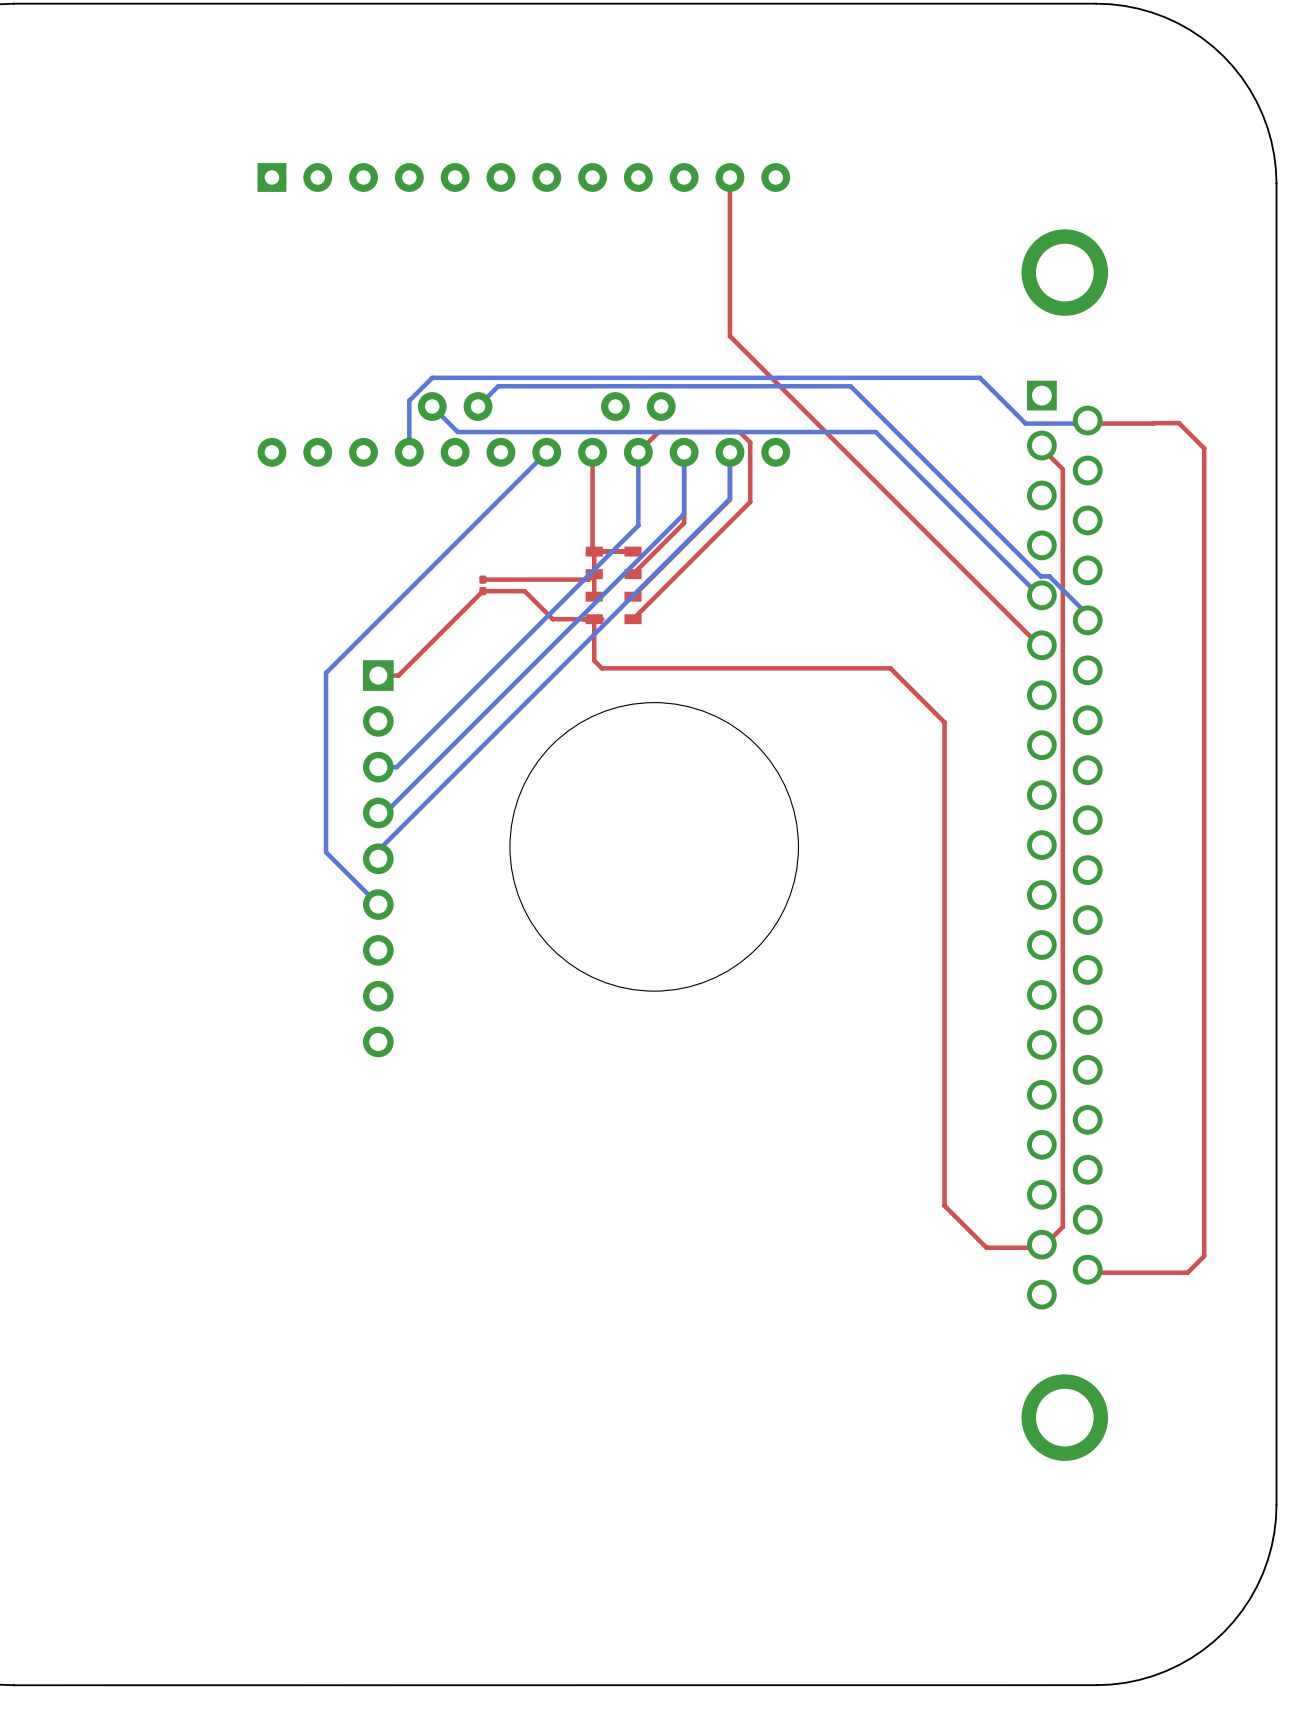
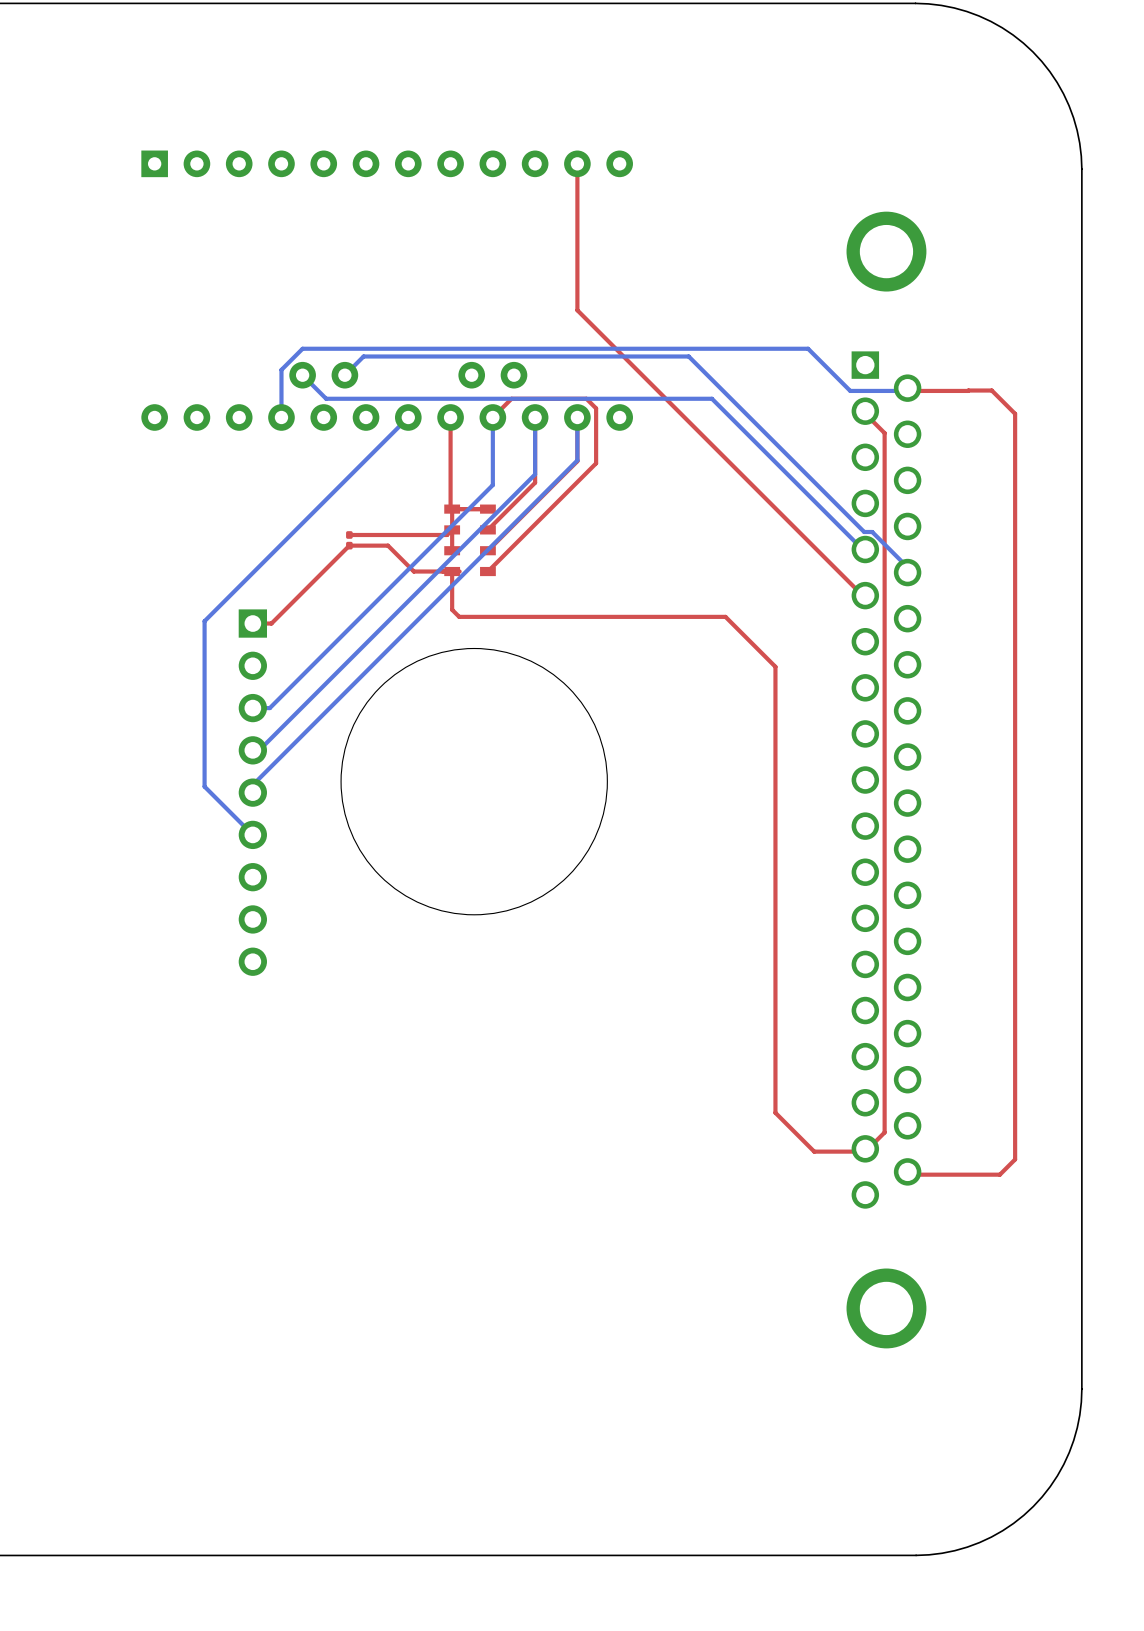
round board edge position: (654, 846) -> (474, 781)

